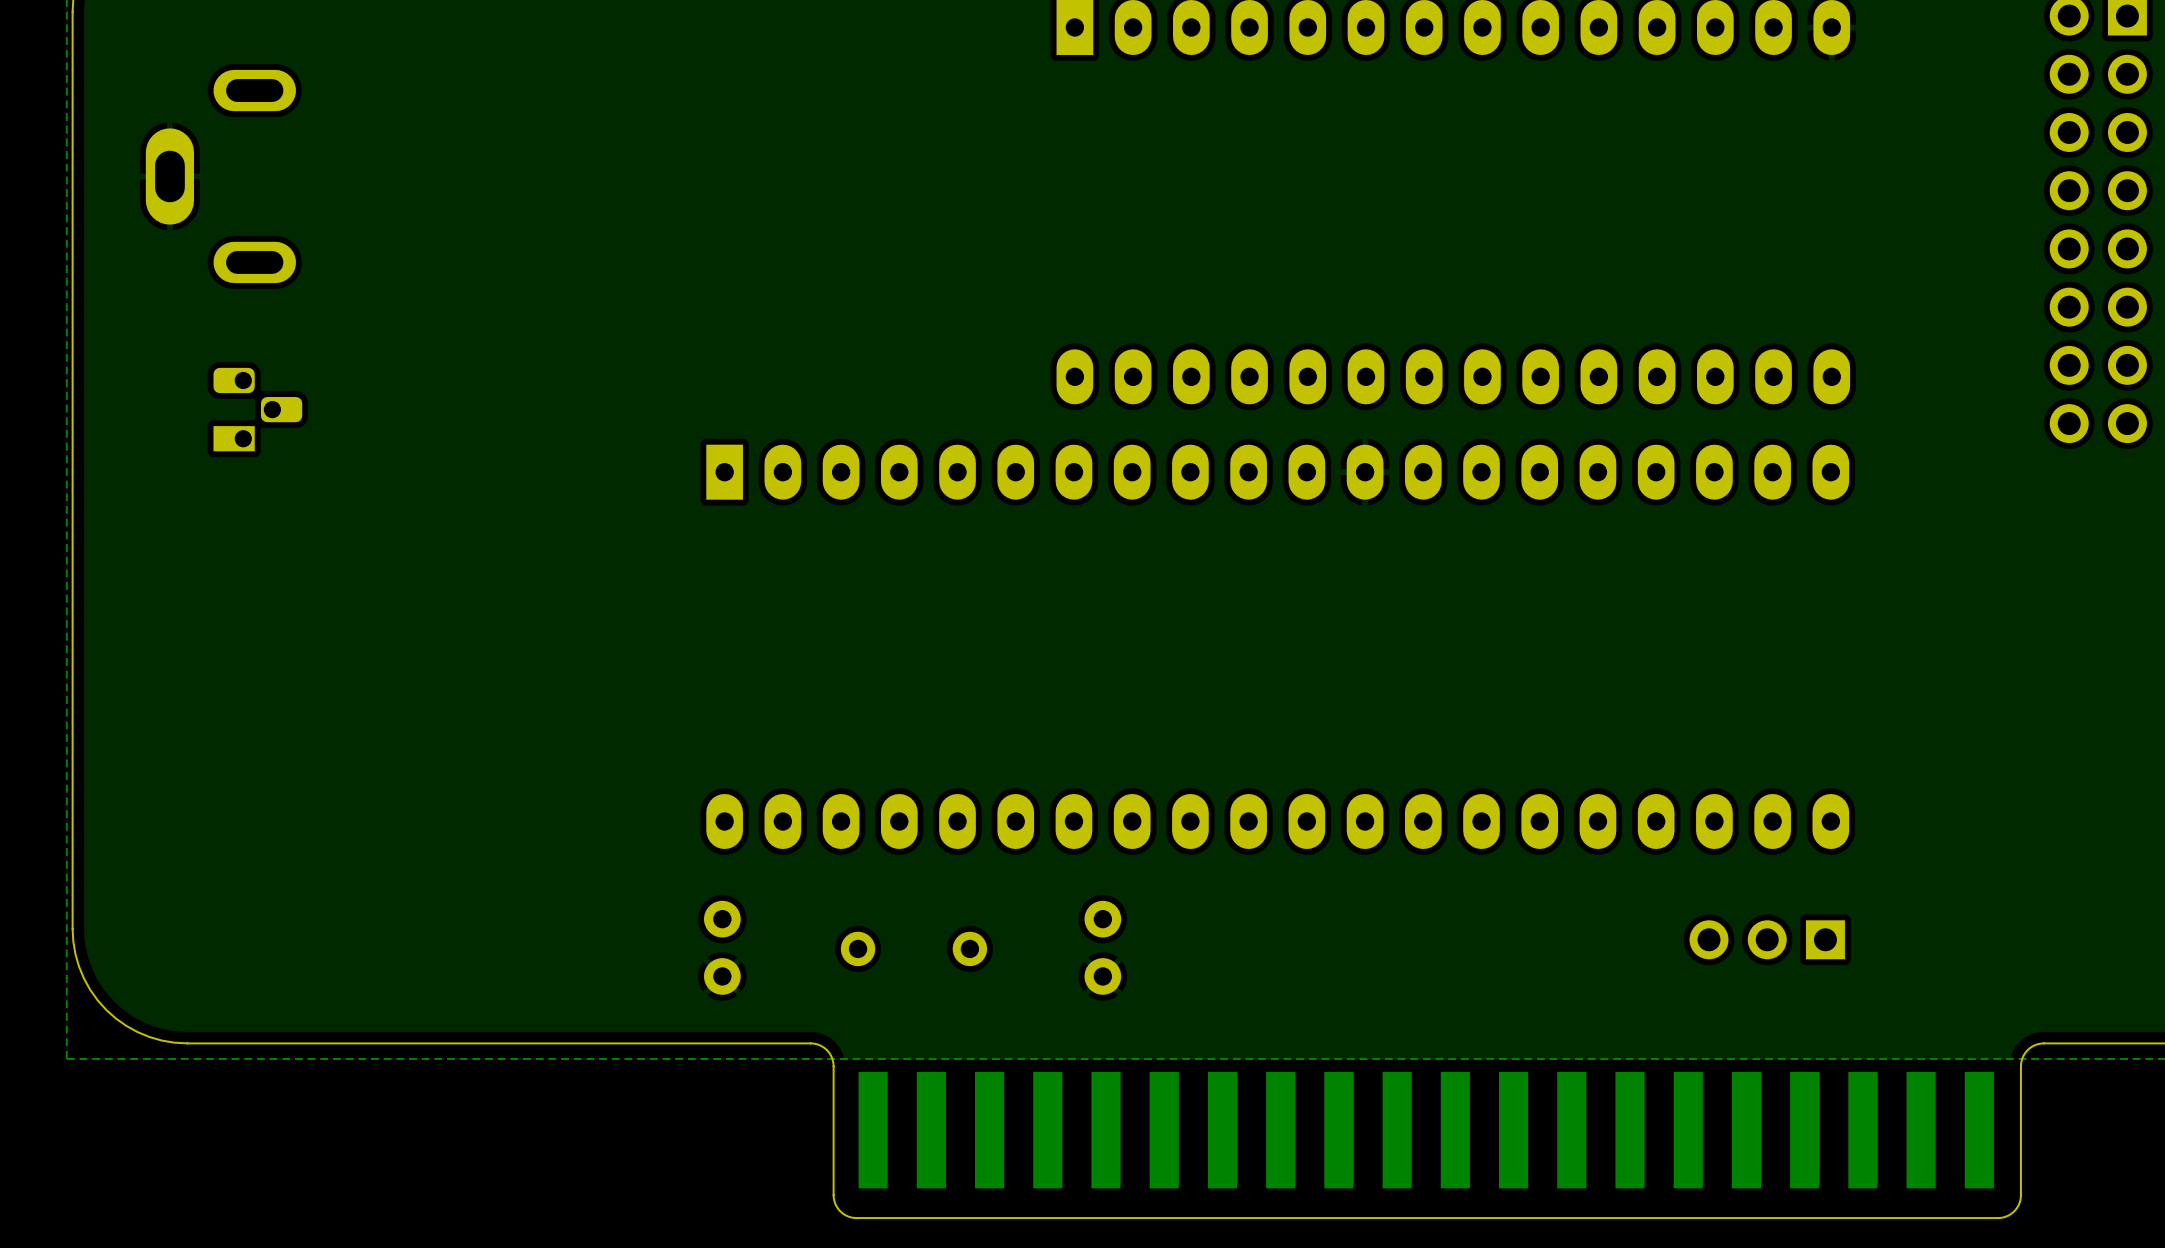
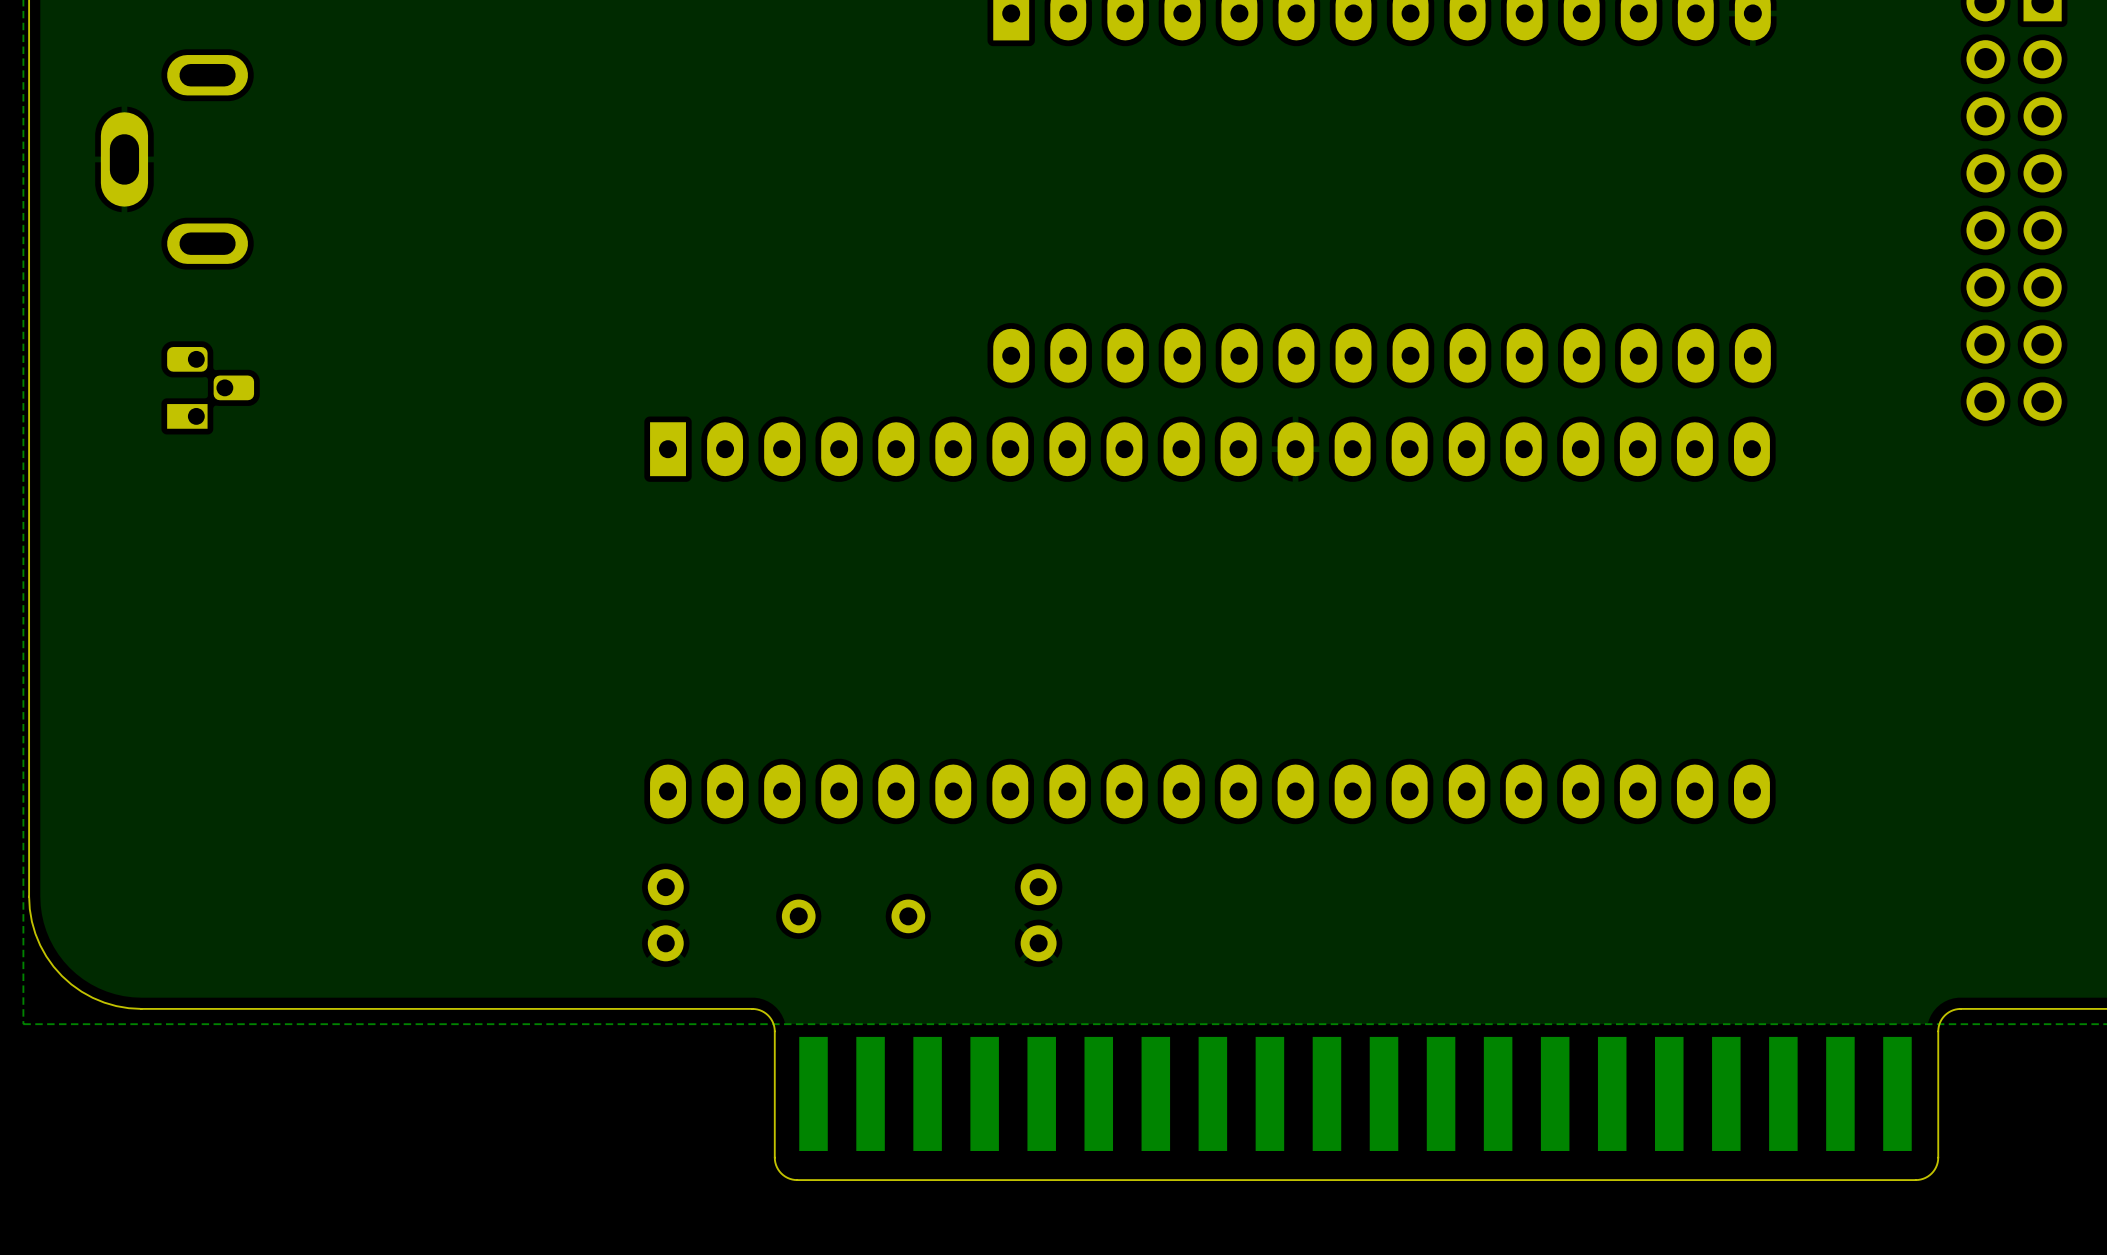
part: (1767, 939) -> none

